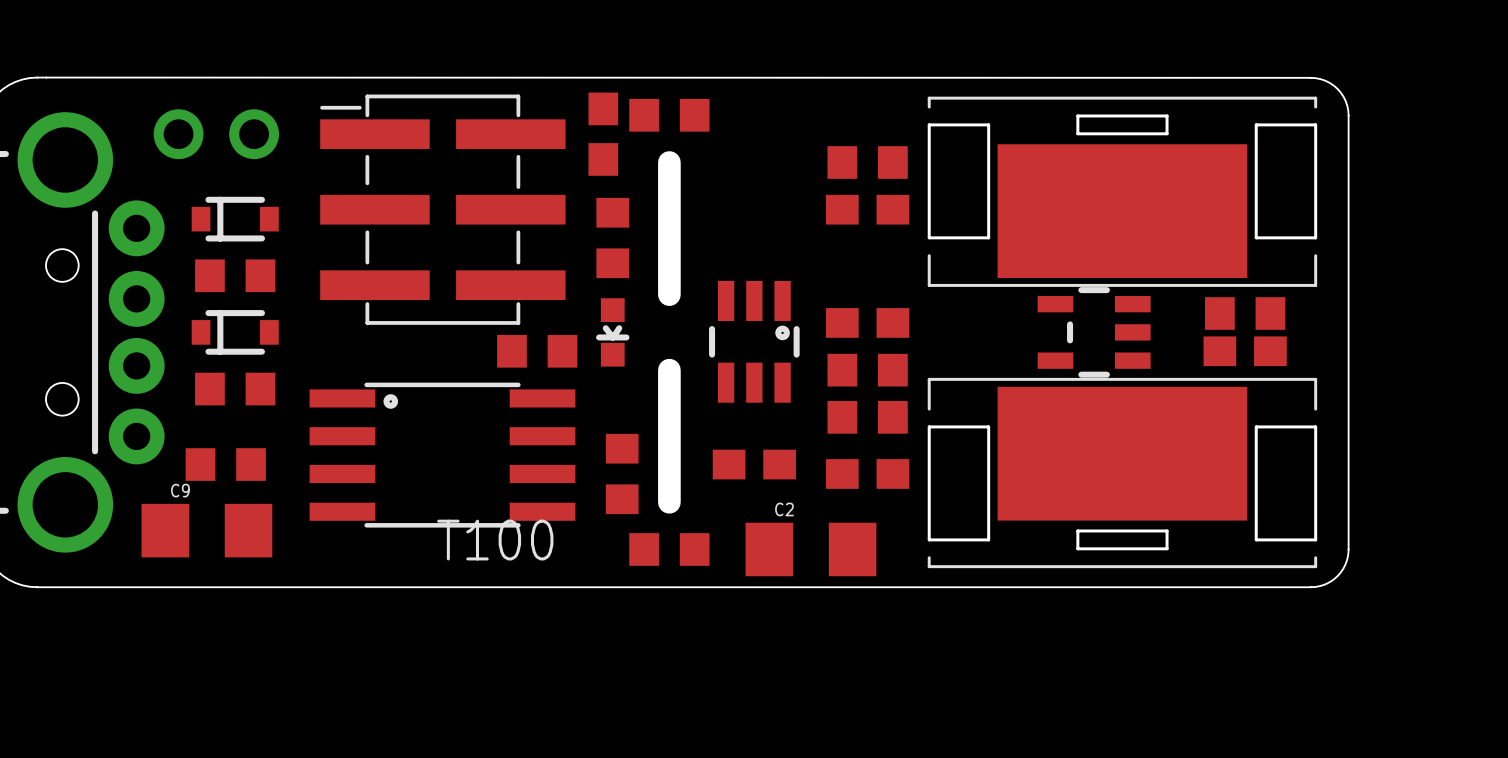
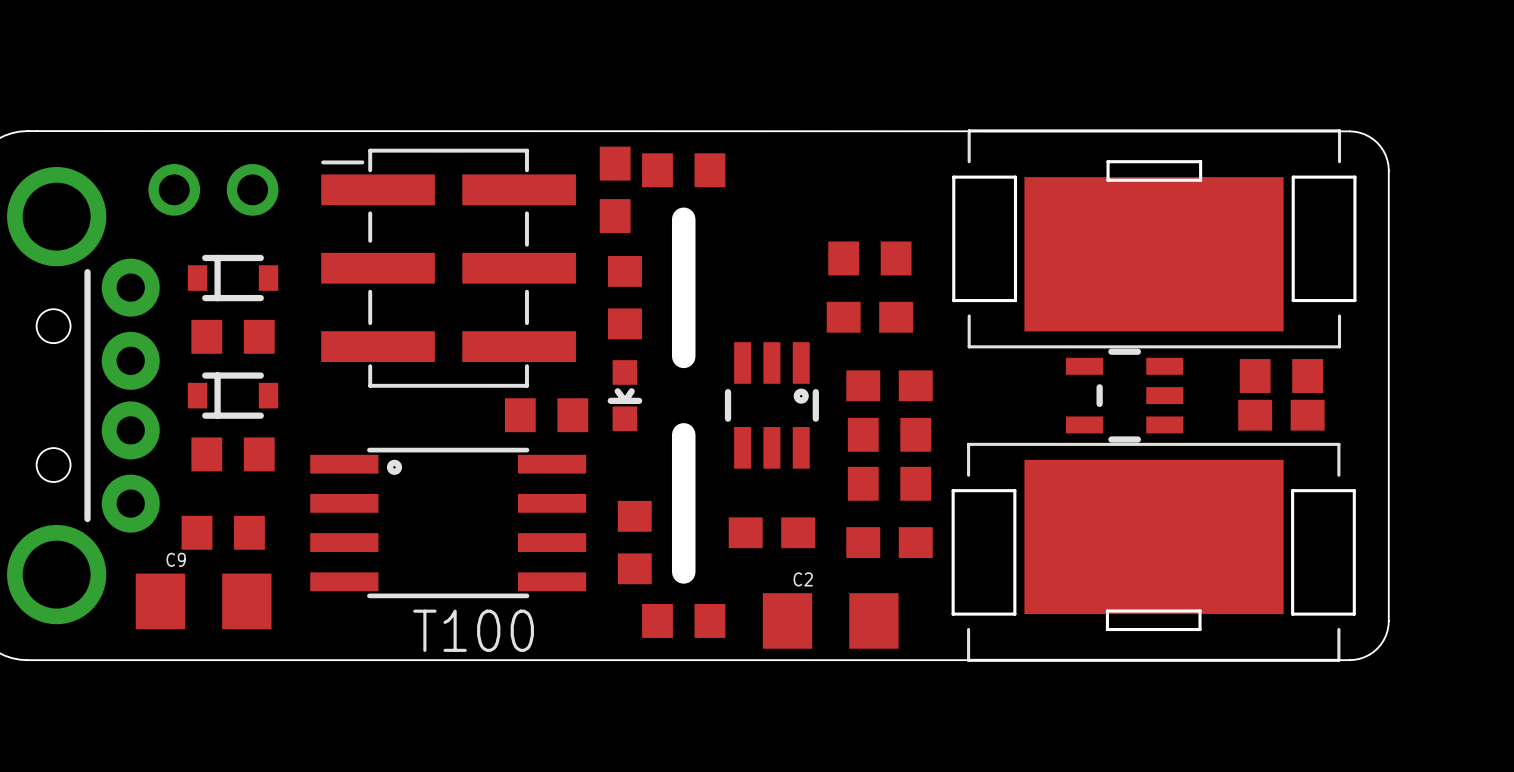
part footprint: [927, 96, 1318, 287] -> [952, 129, 1357, 349]
part position: (867, 162) -> (869, 258)
part position: (867, 209) -> (869, 317)
part footprint: [927, 377, 1318, 569] -> [951, 442, 1356, 662]
text position: T100 (495, 540) -> T100 (473, 630)

